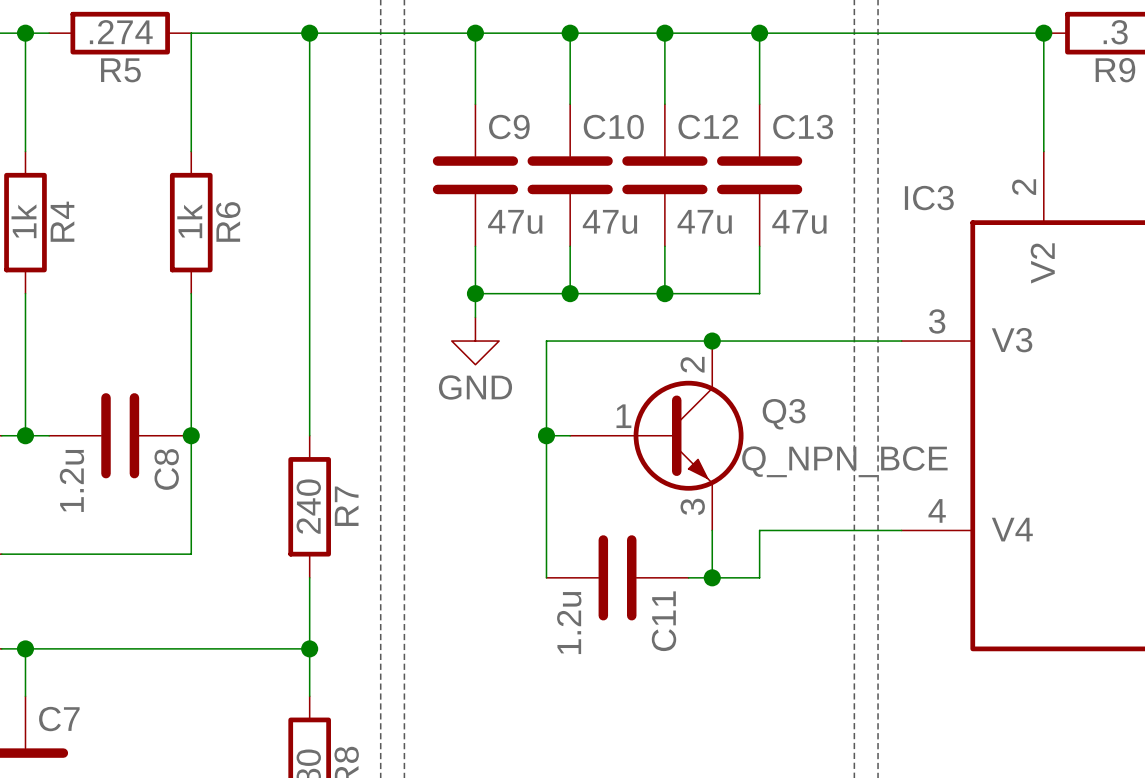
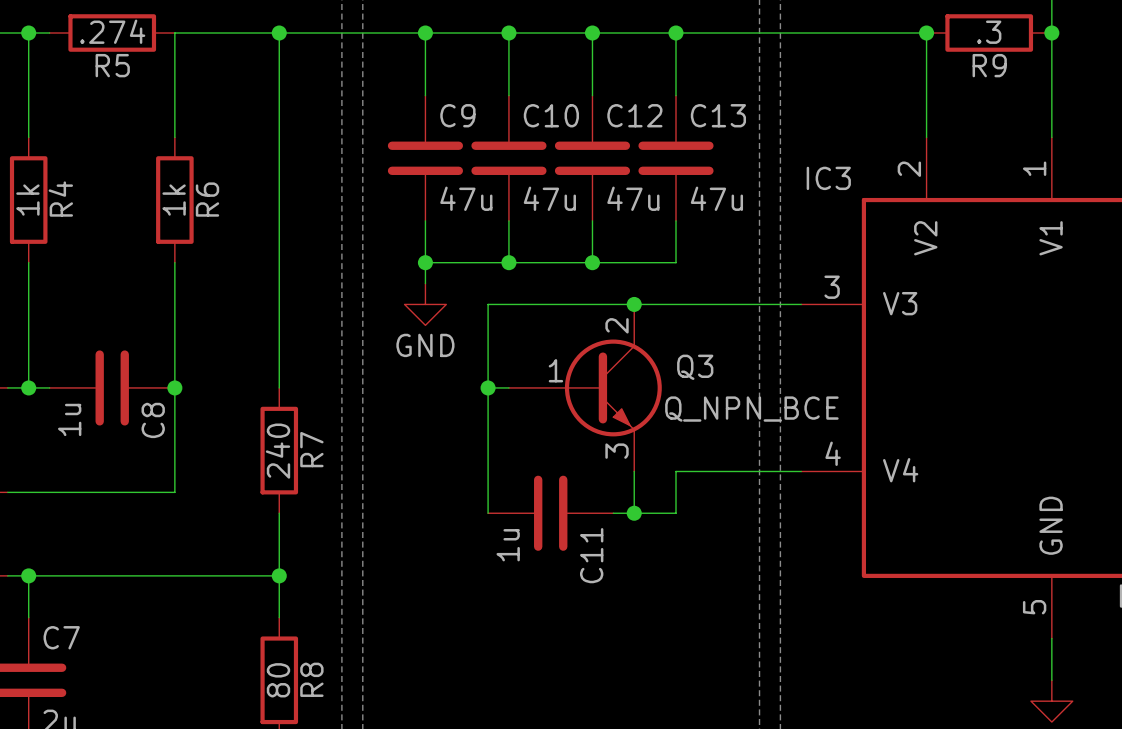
C8 value: 1.2u (71, 480) -> 1u (69, 419)
C11 value: 1.2u (569, 623) -> 1u (508, 545)

